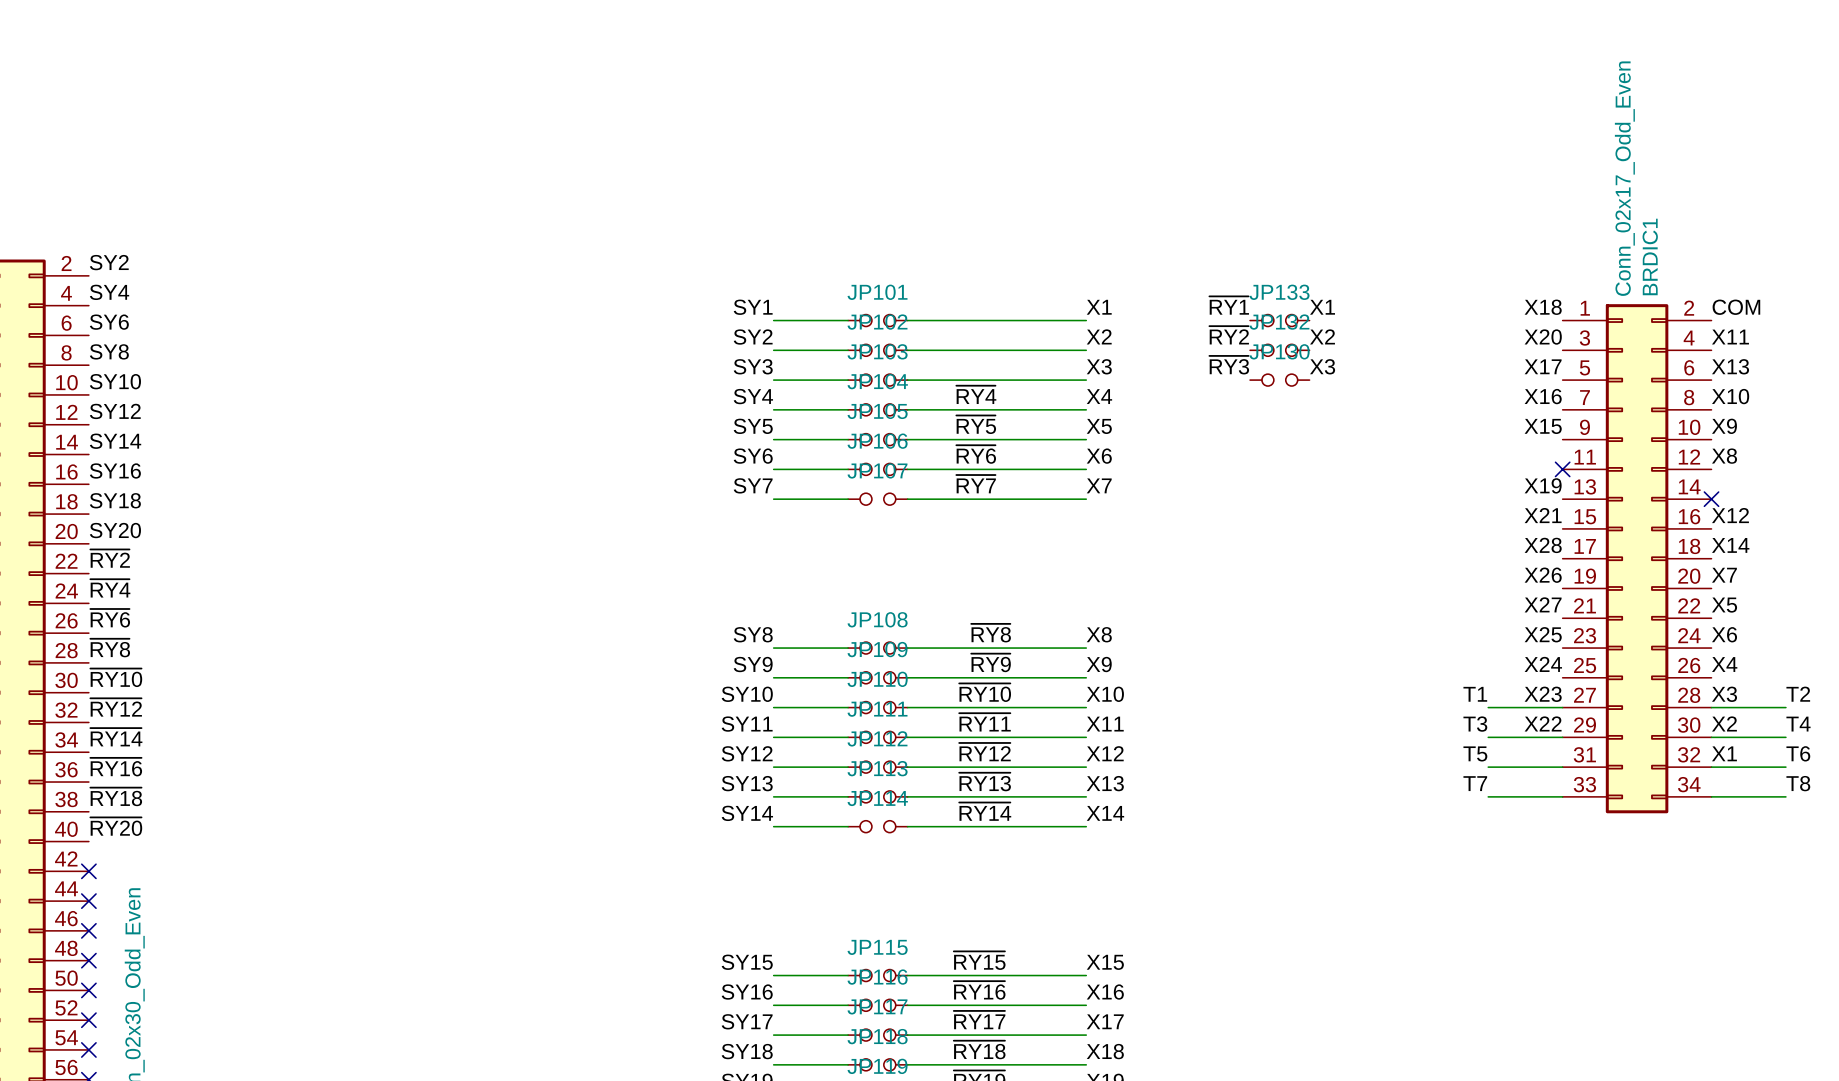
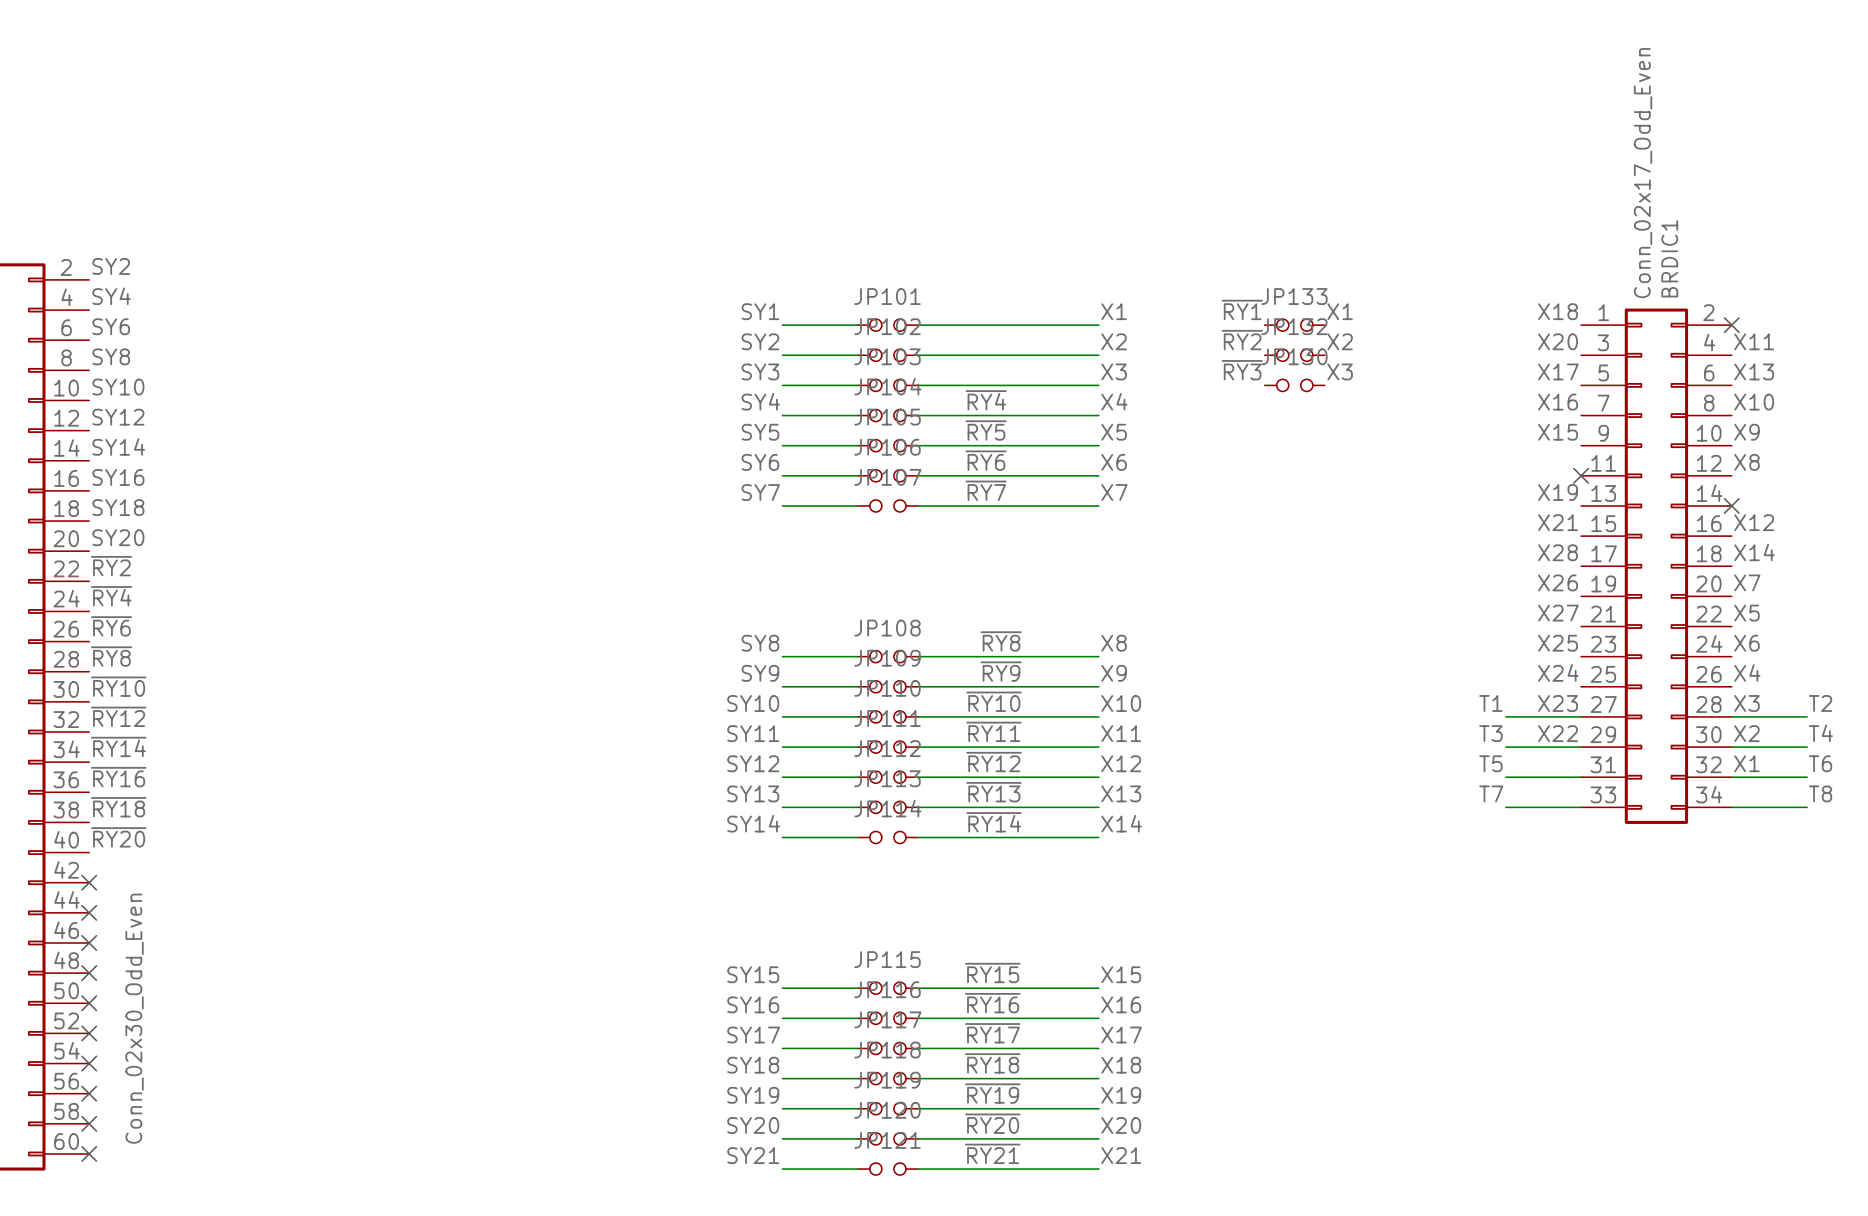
label: COM (1736, 307) -> none
no-connect mark: none -> (1731, 325)

